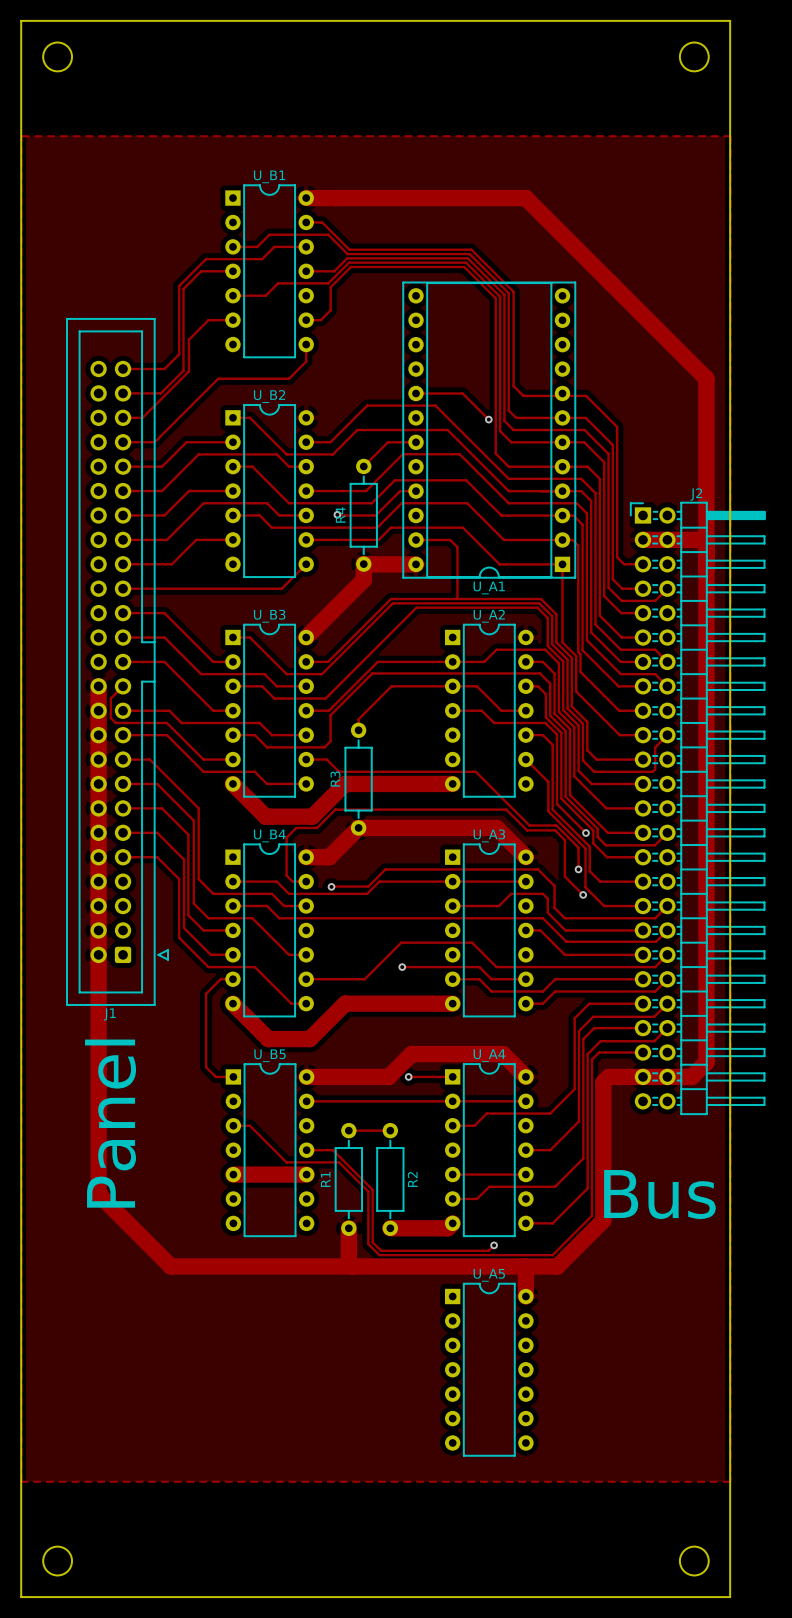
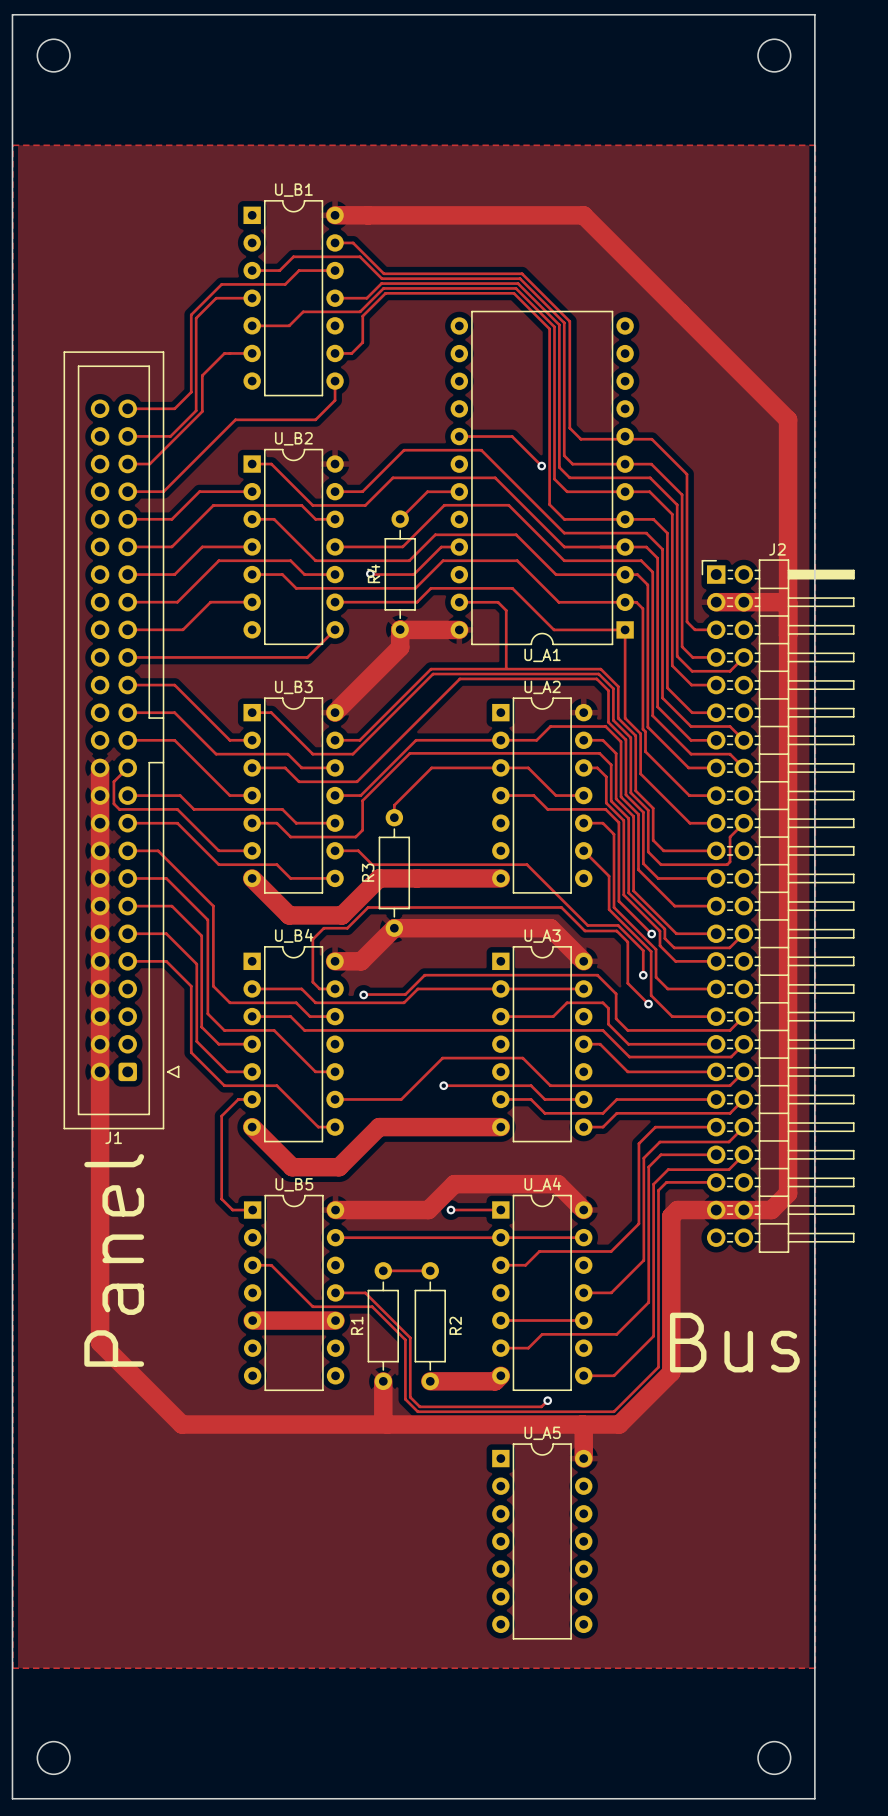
U_A1 footprint: [402, 281, 576, 579] -> [450, 310, 634, 646]

